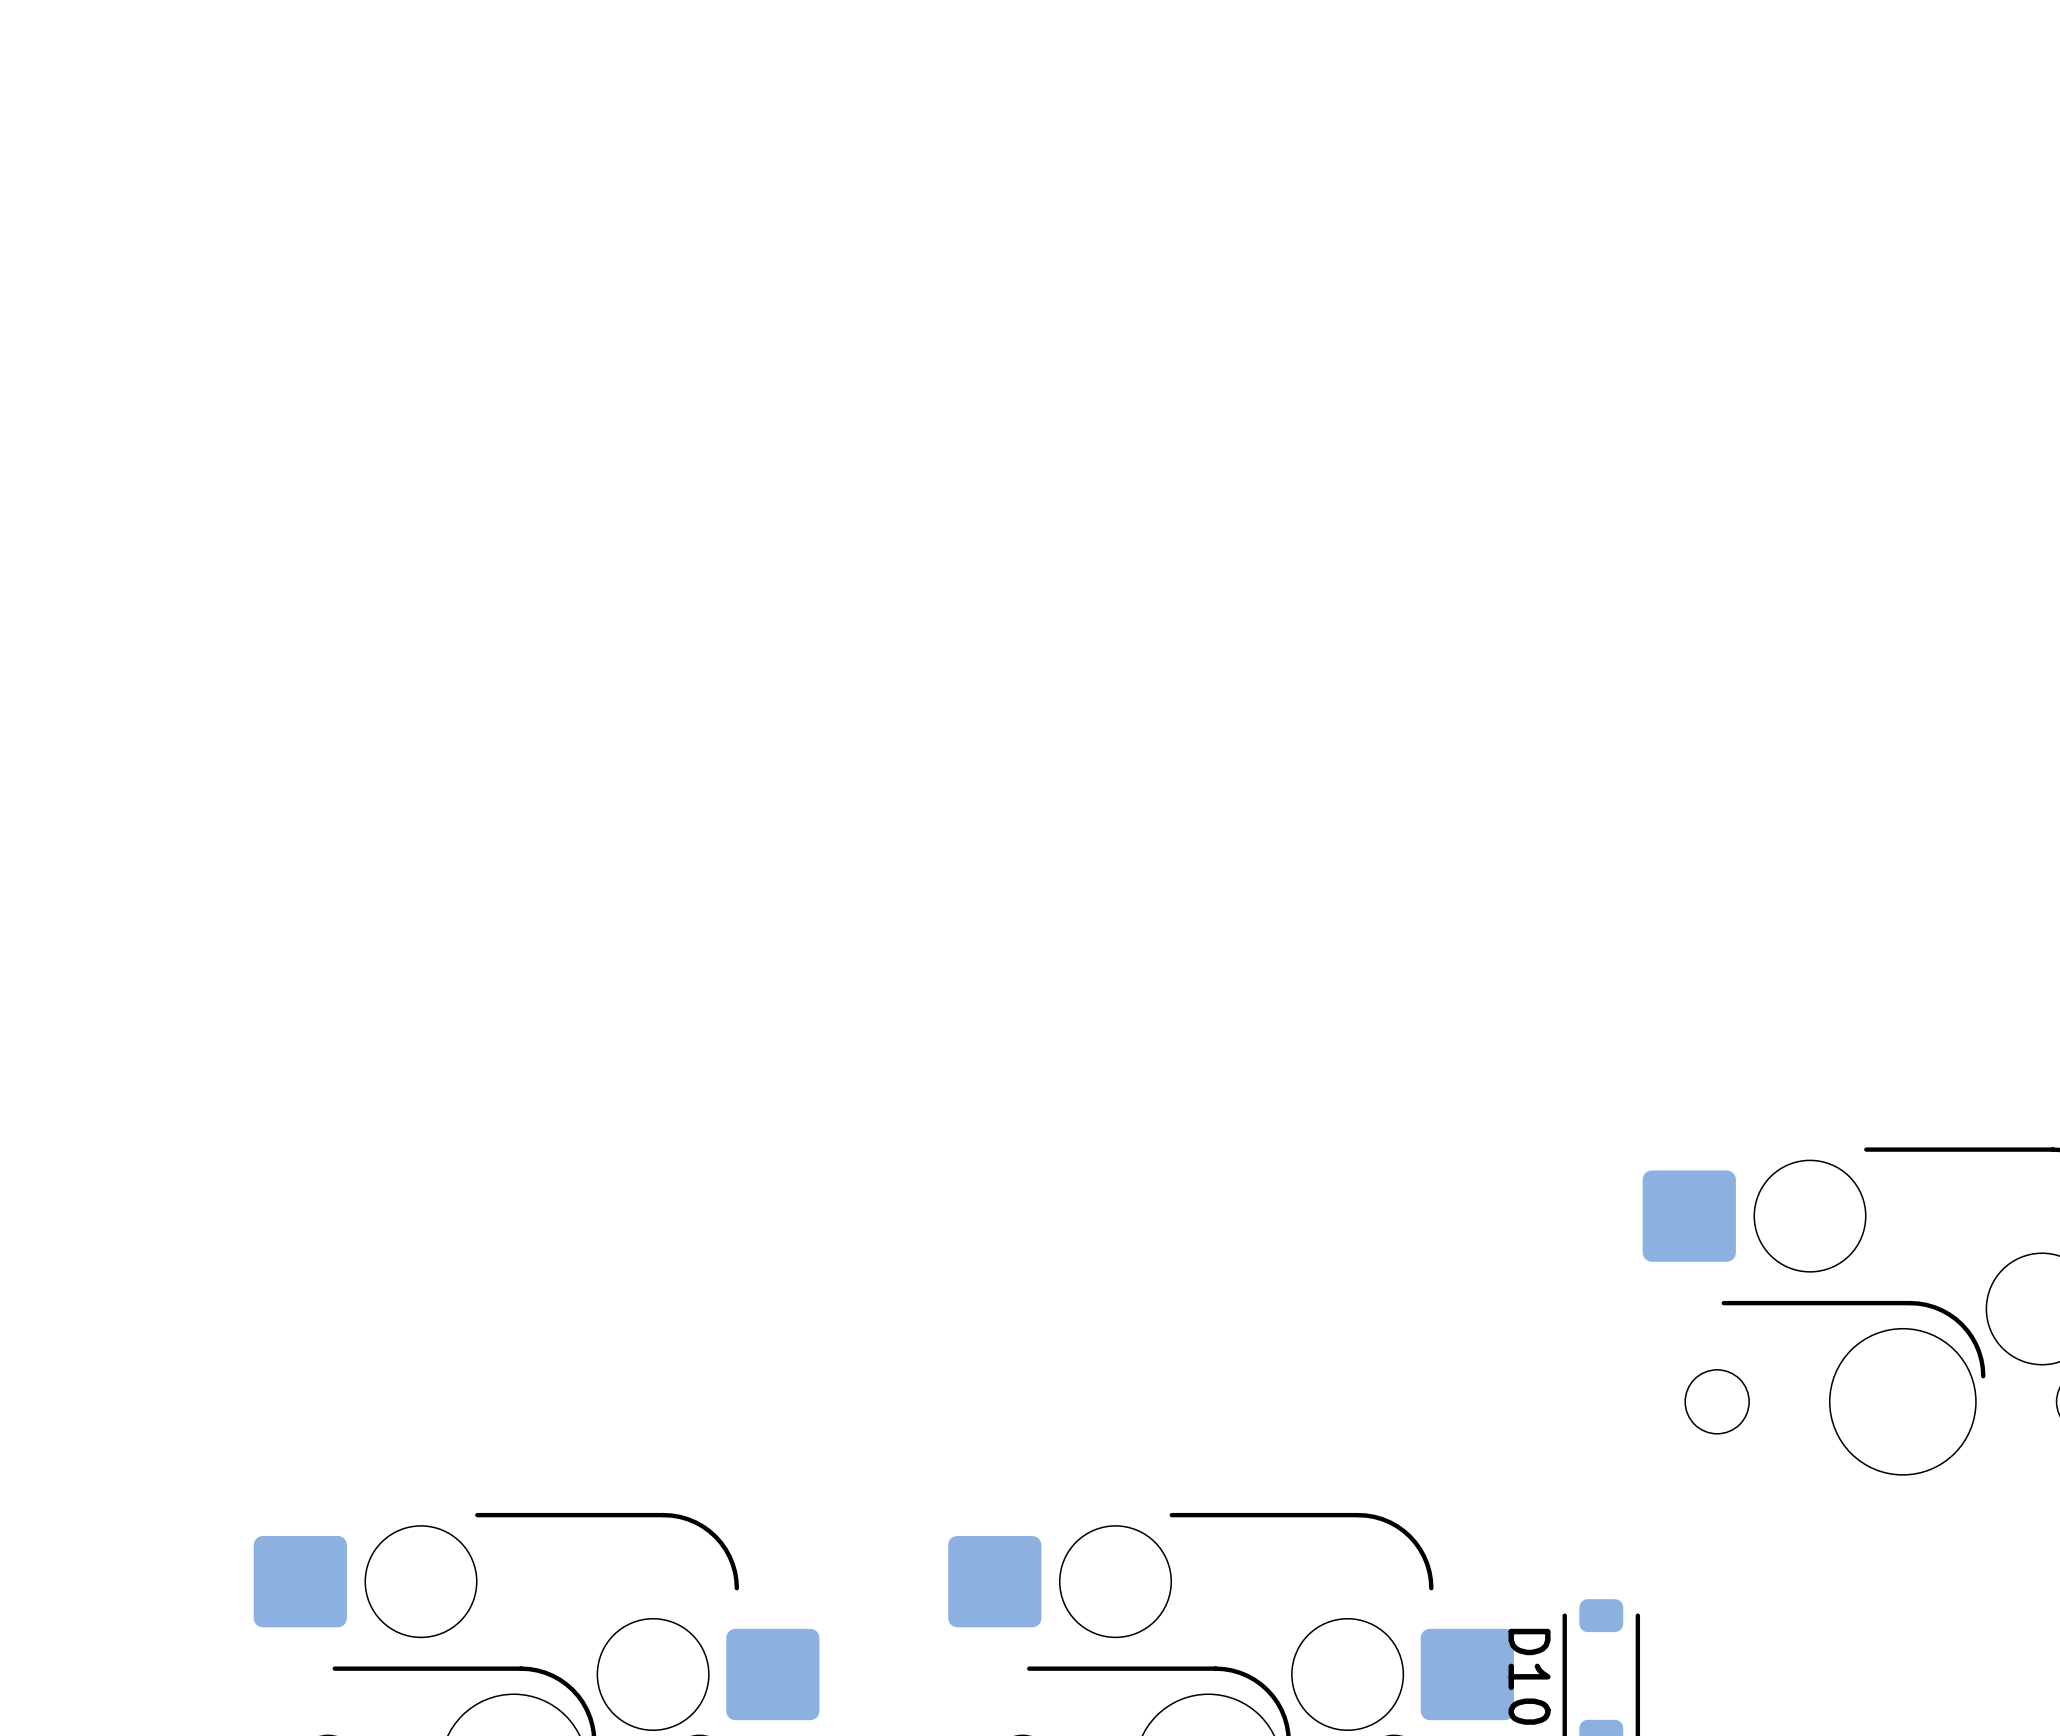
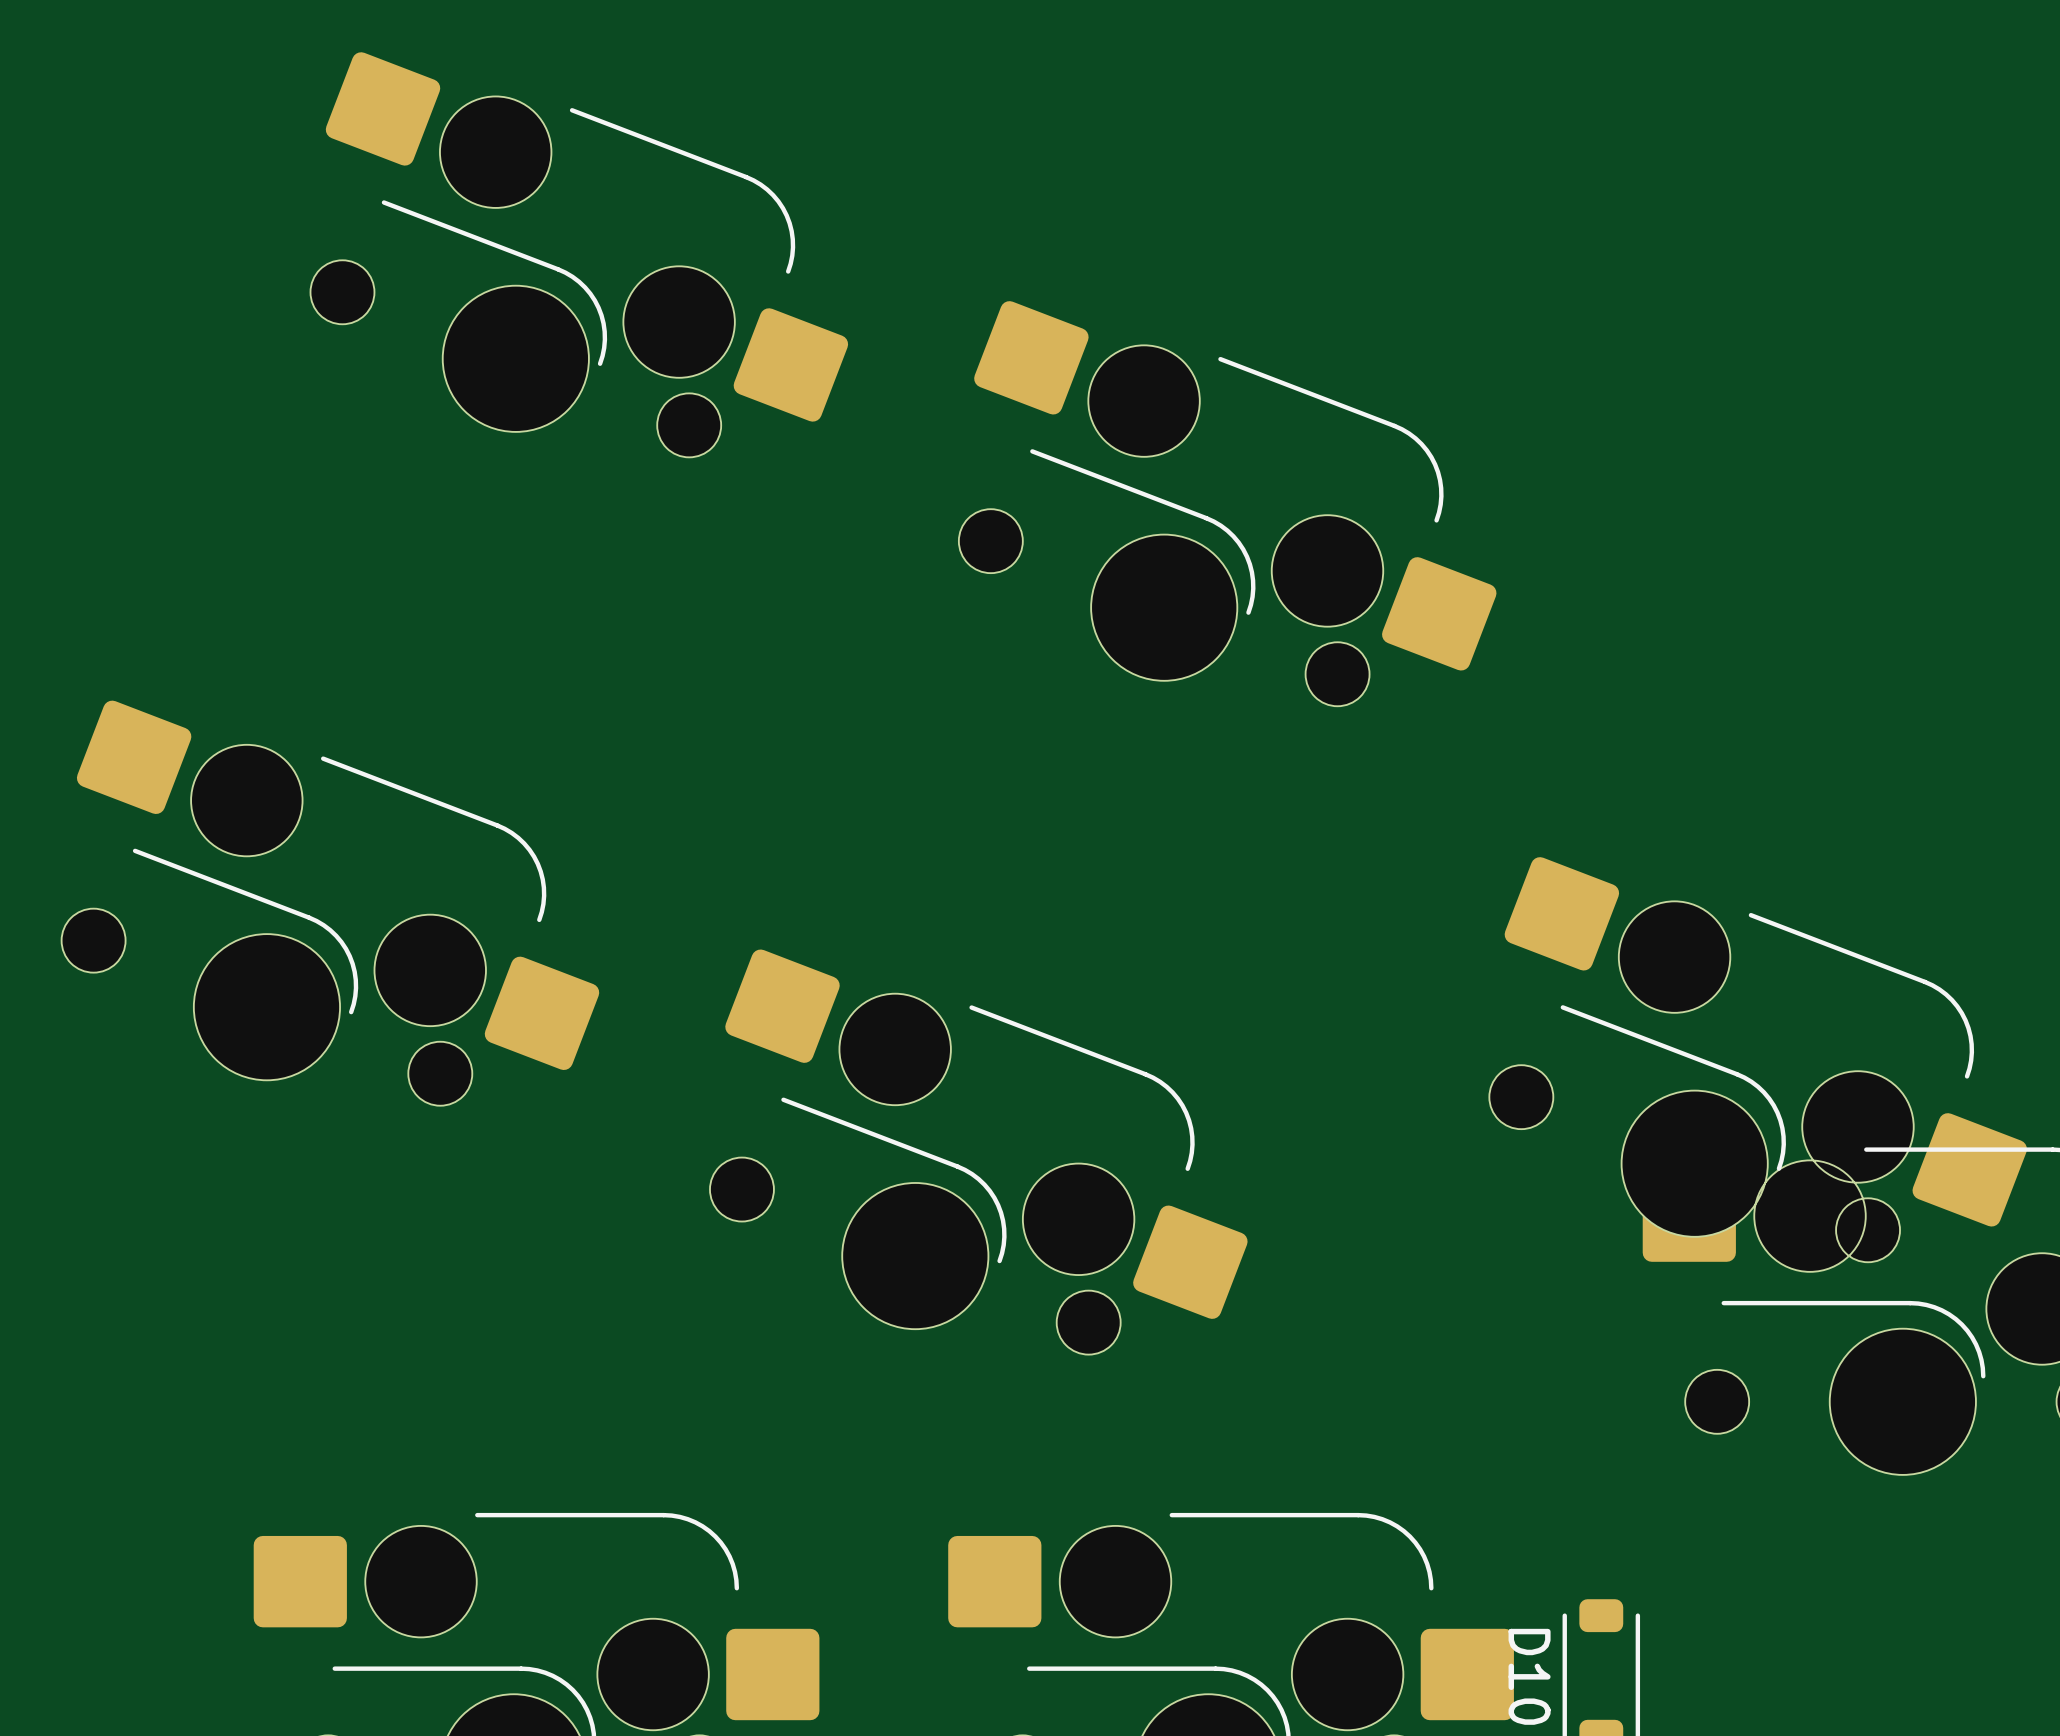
part: none -> (579, 254)
part: none -> (1227, 503)
part: none -> (330, 903)
part: none -> (1758, 1059)
part: none -> (978, 1152)

